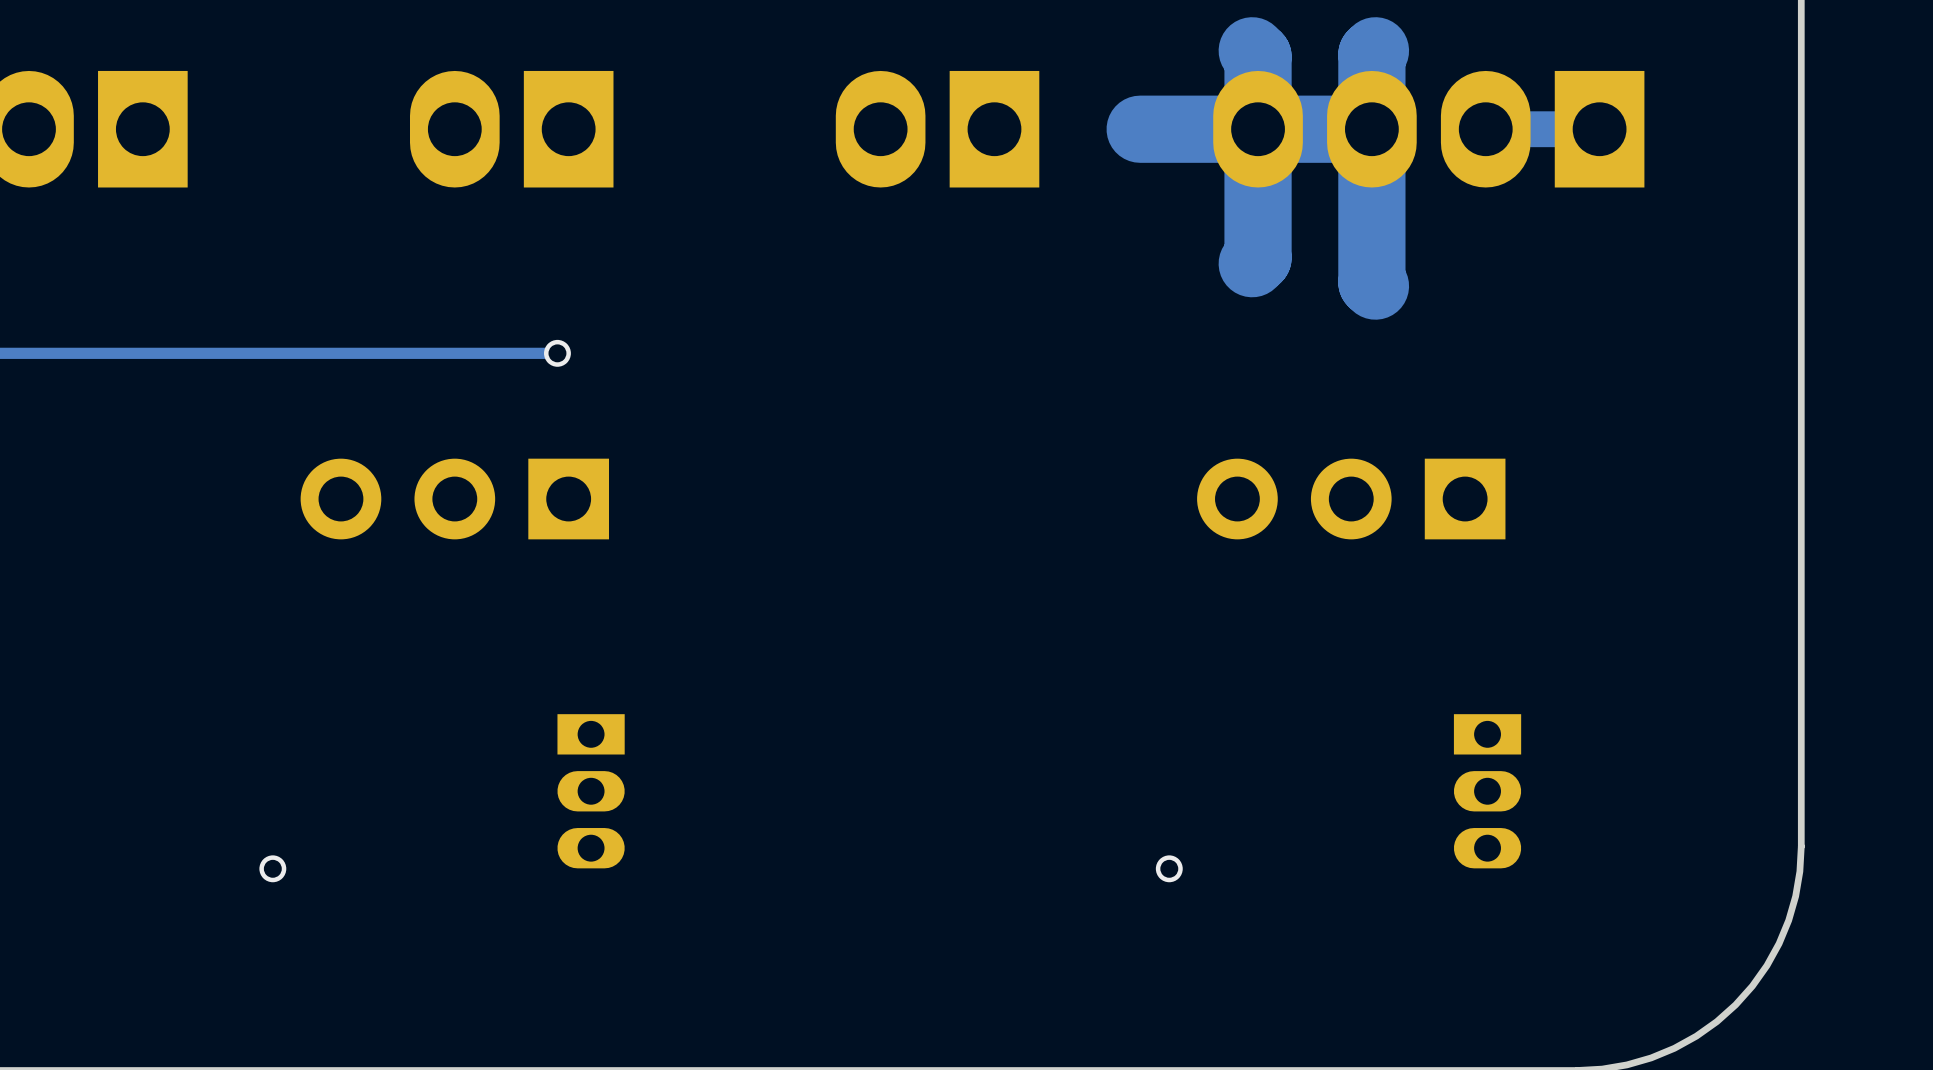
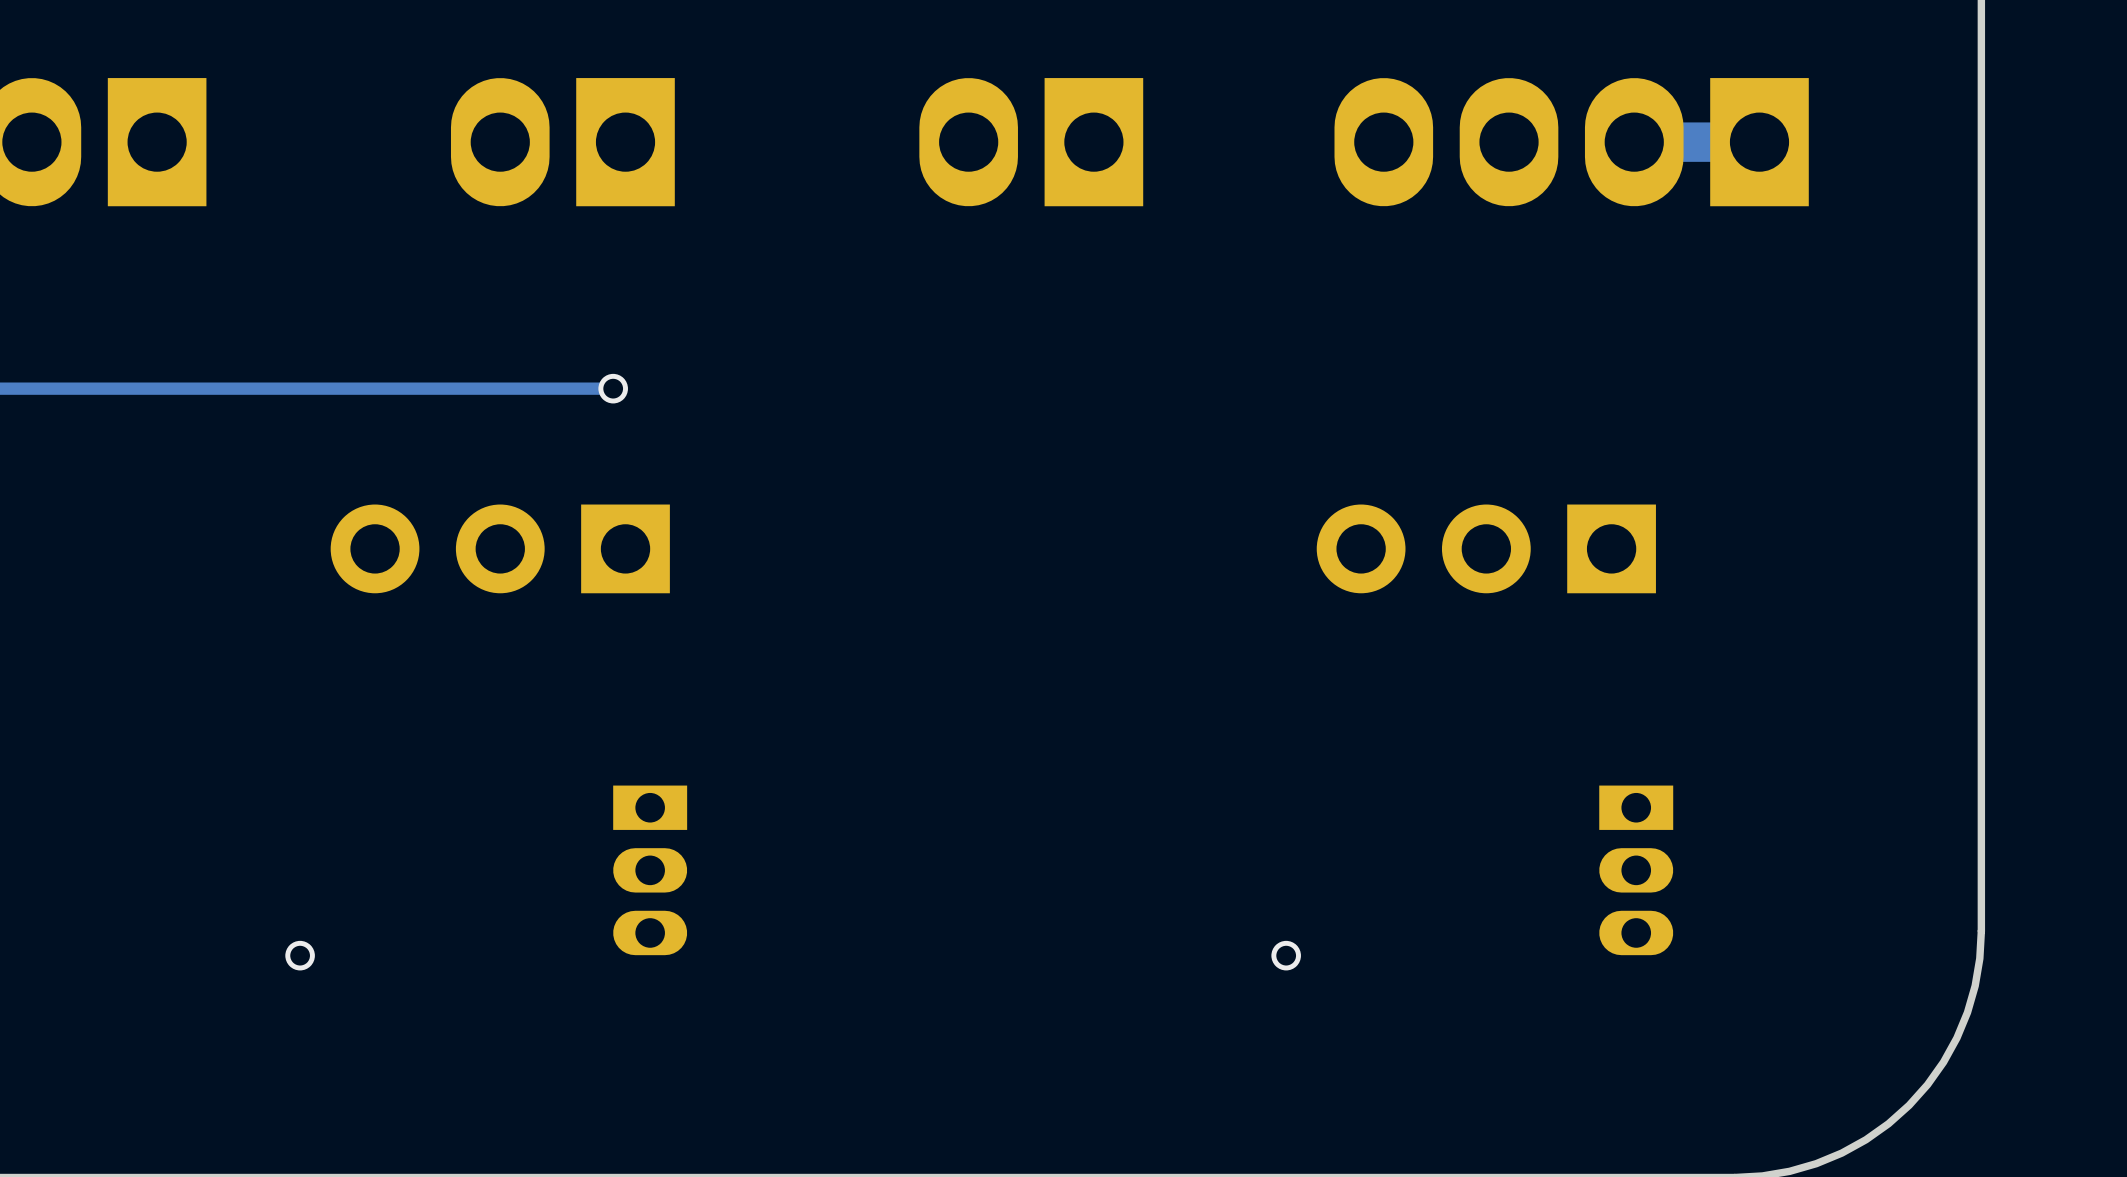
track: (1252, 50) (1258, 56) (1258, 257) (1252, 263) -> none
track: (1375, 50) (1371, 54) (1371, 282) (1375, 286) -> none
track: (1371, 129) (1140, 129) -> none

